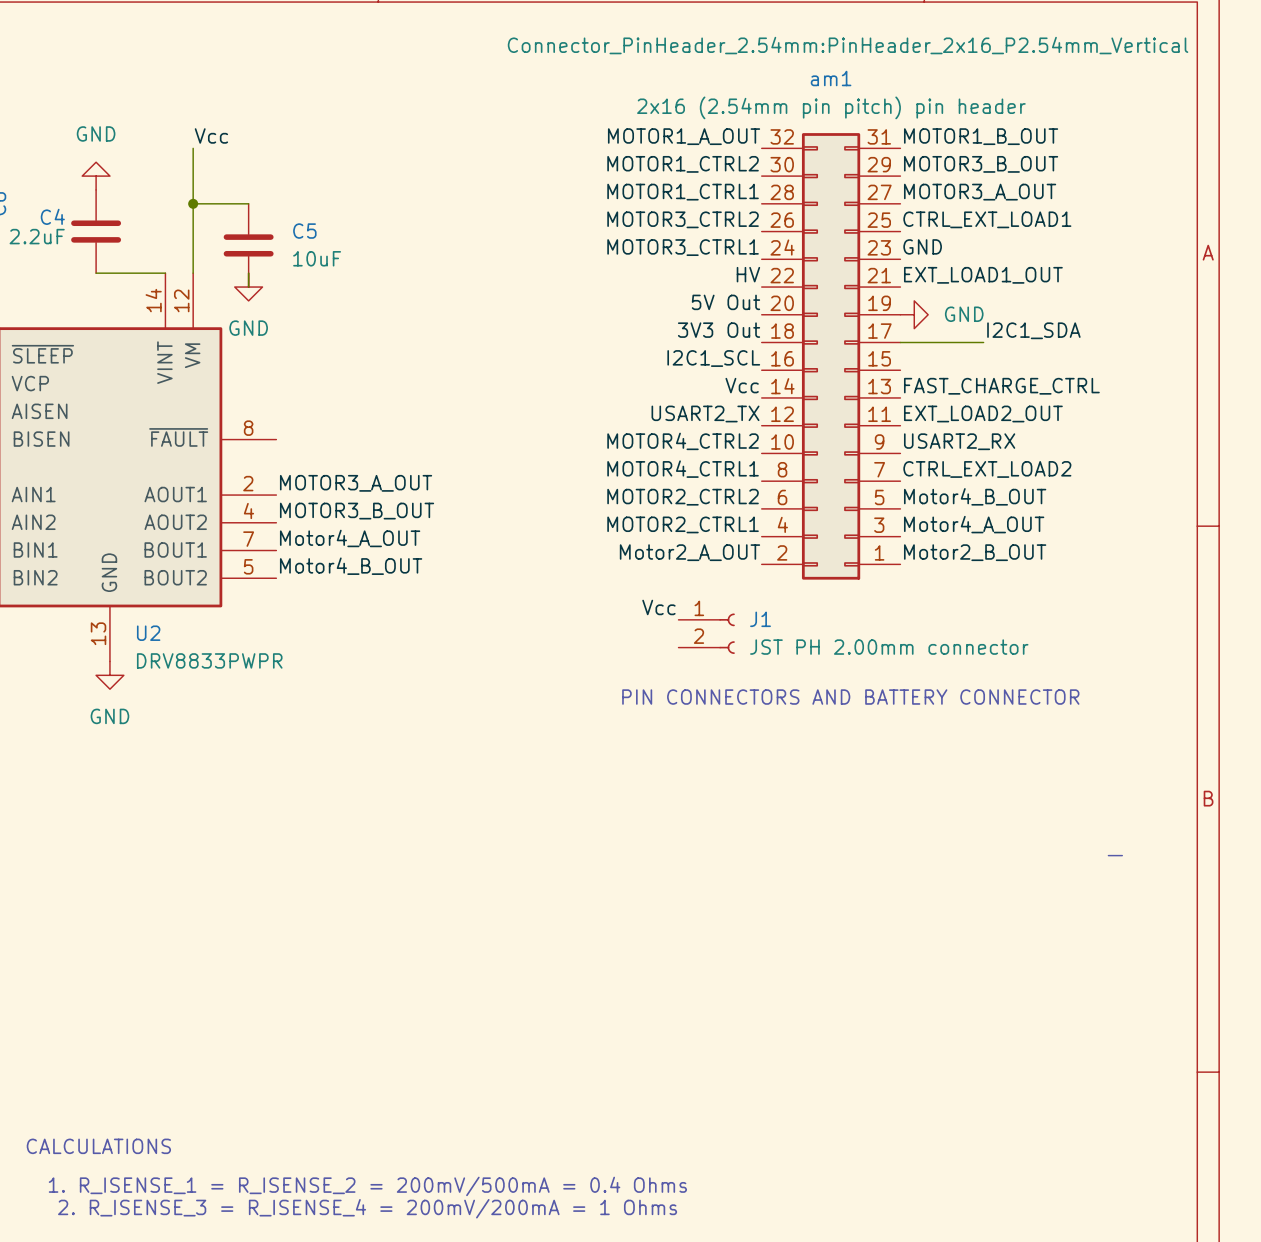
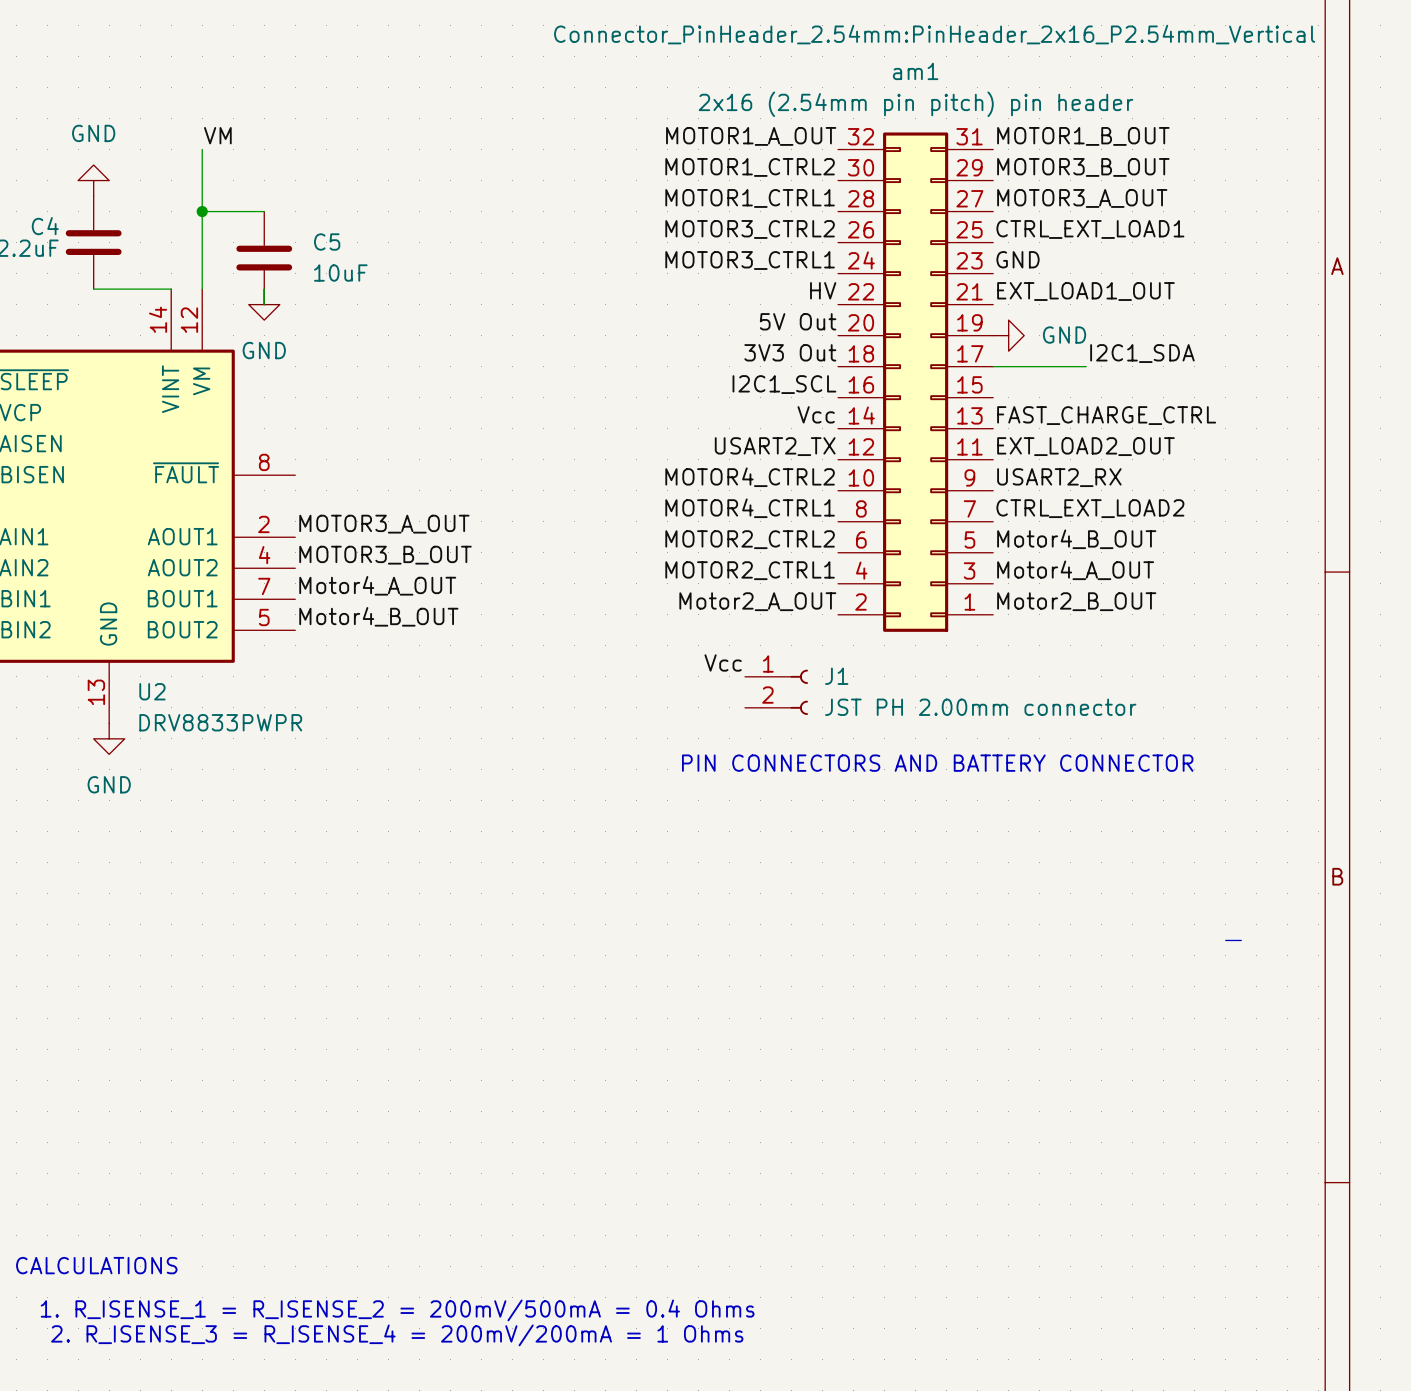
label: Vcc (211, 135) -> VM (217, 135)

